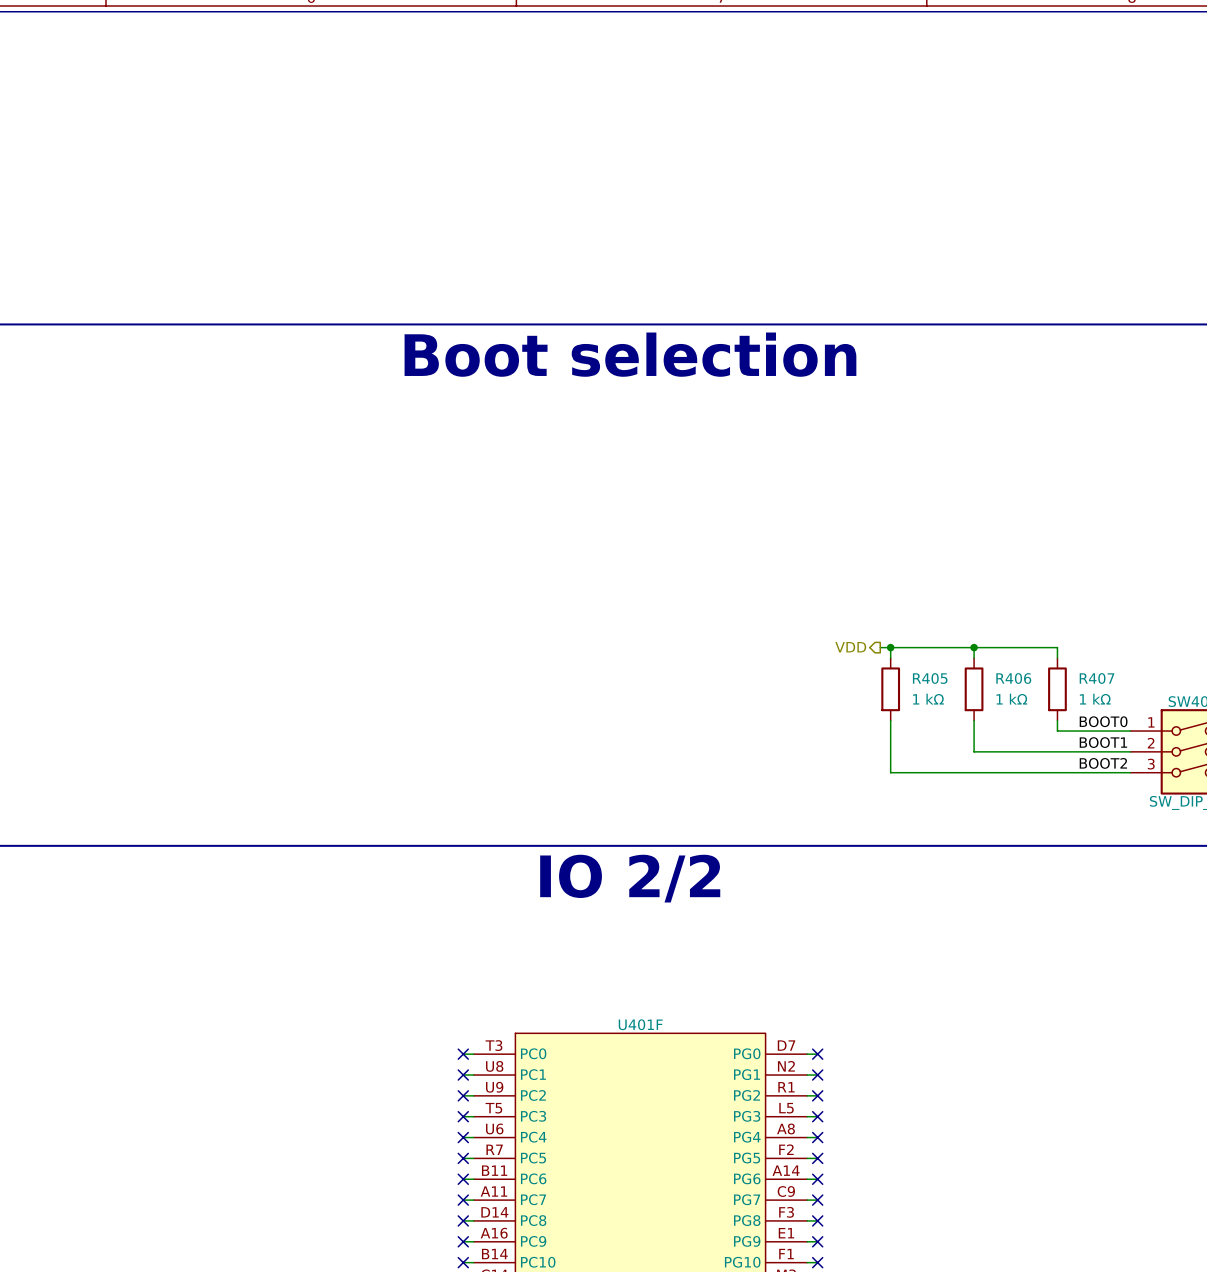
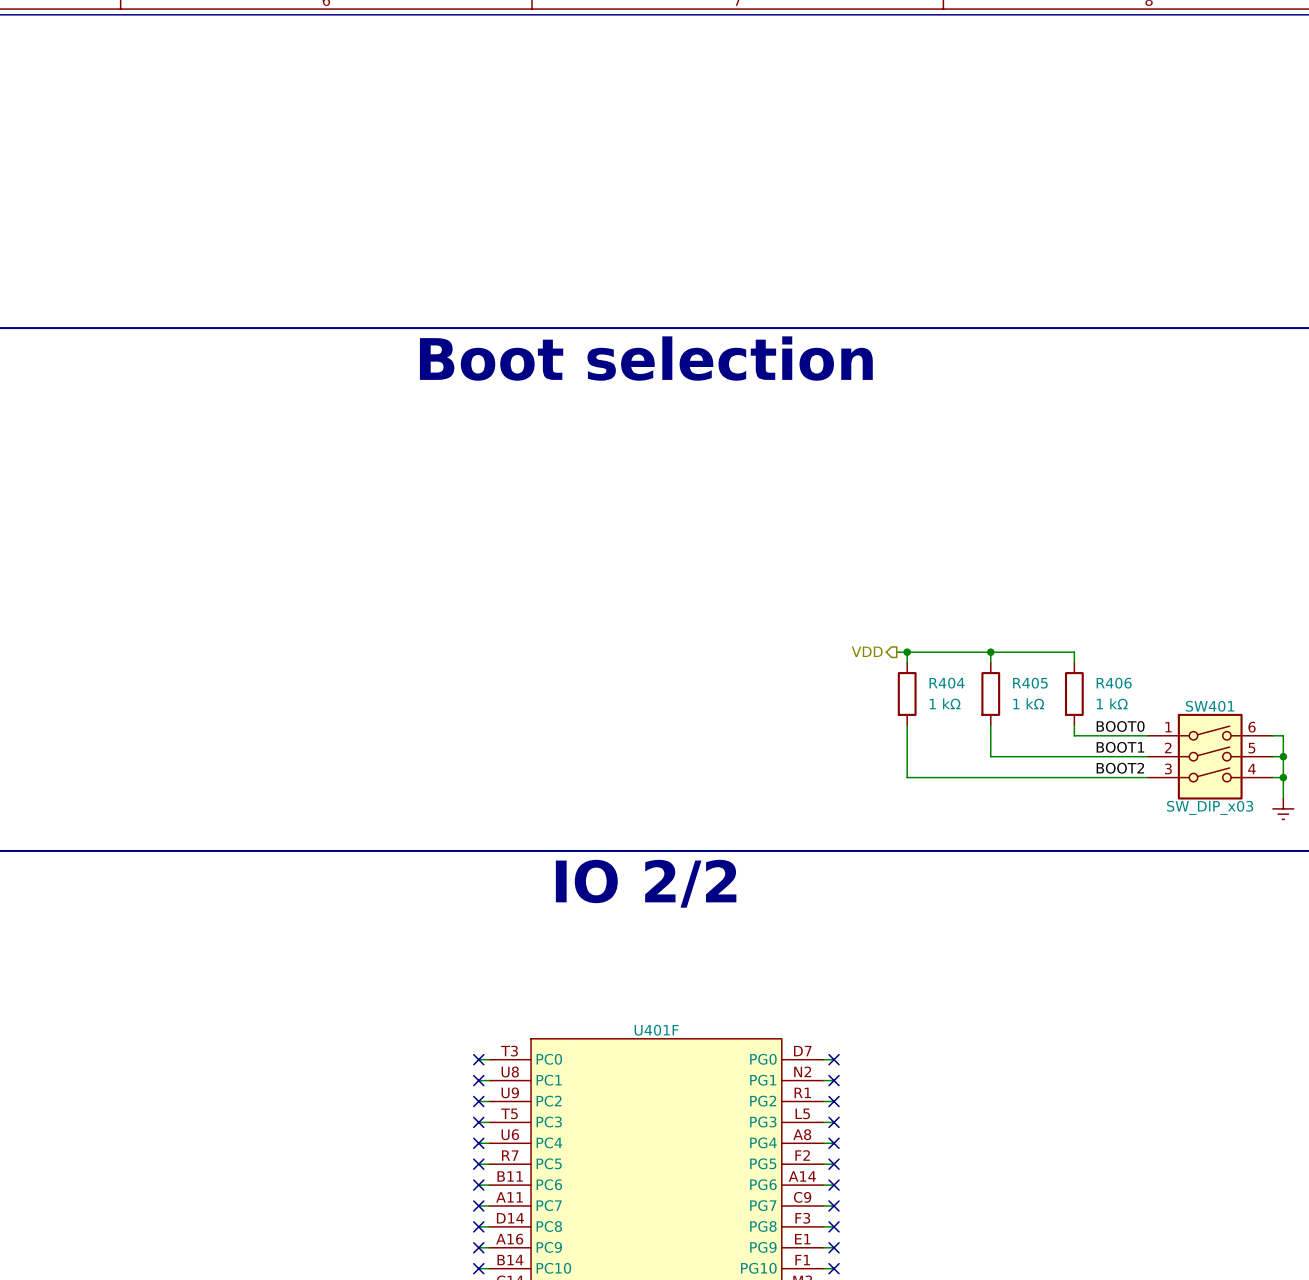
R405 name: R405 (930, 678) -> R404 (947, 683)
R406 name: R406 (1013, 678) -> R405 (1030, 683)
R407 name: R407 (1097, 678) -> R406 (1114, 683)

